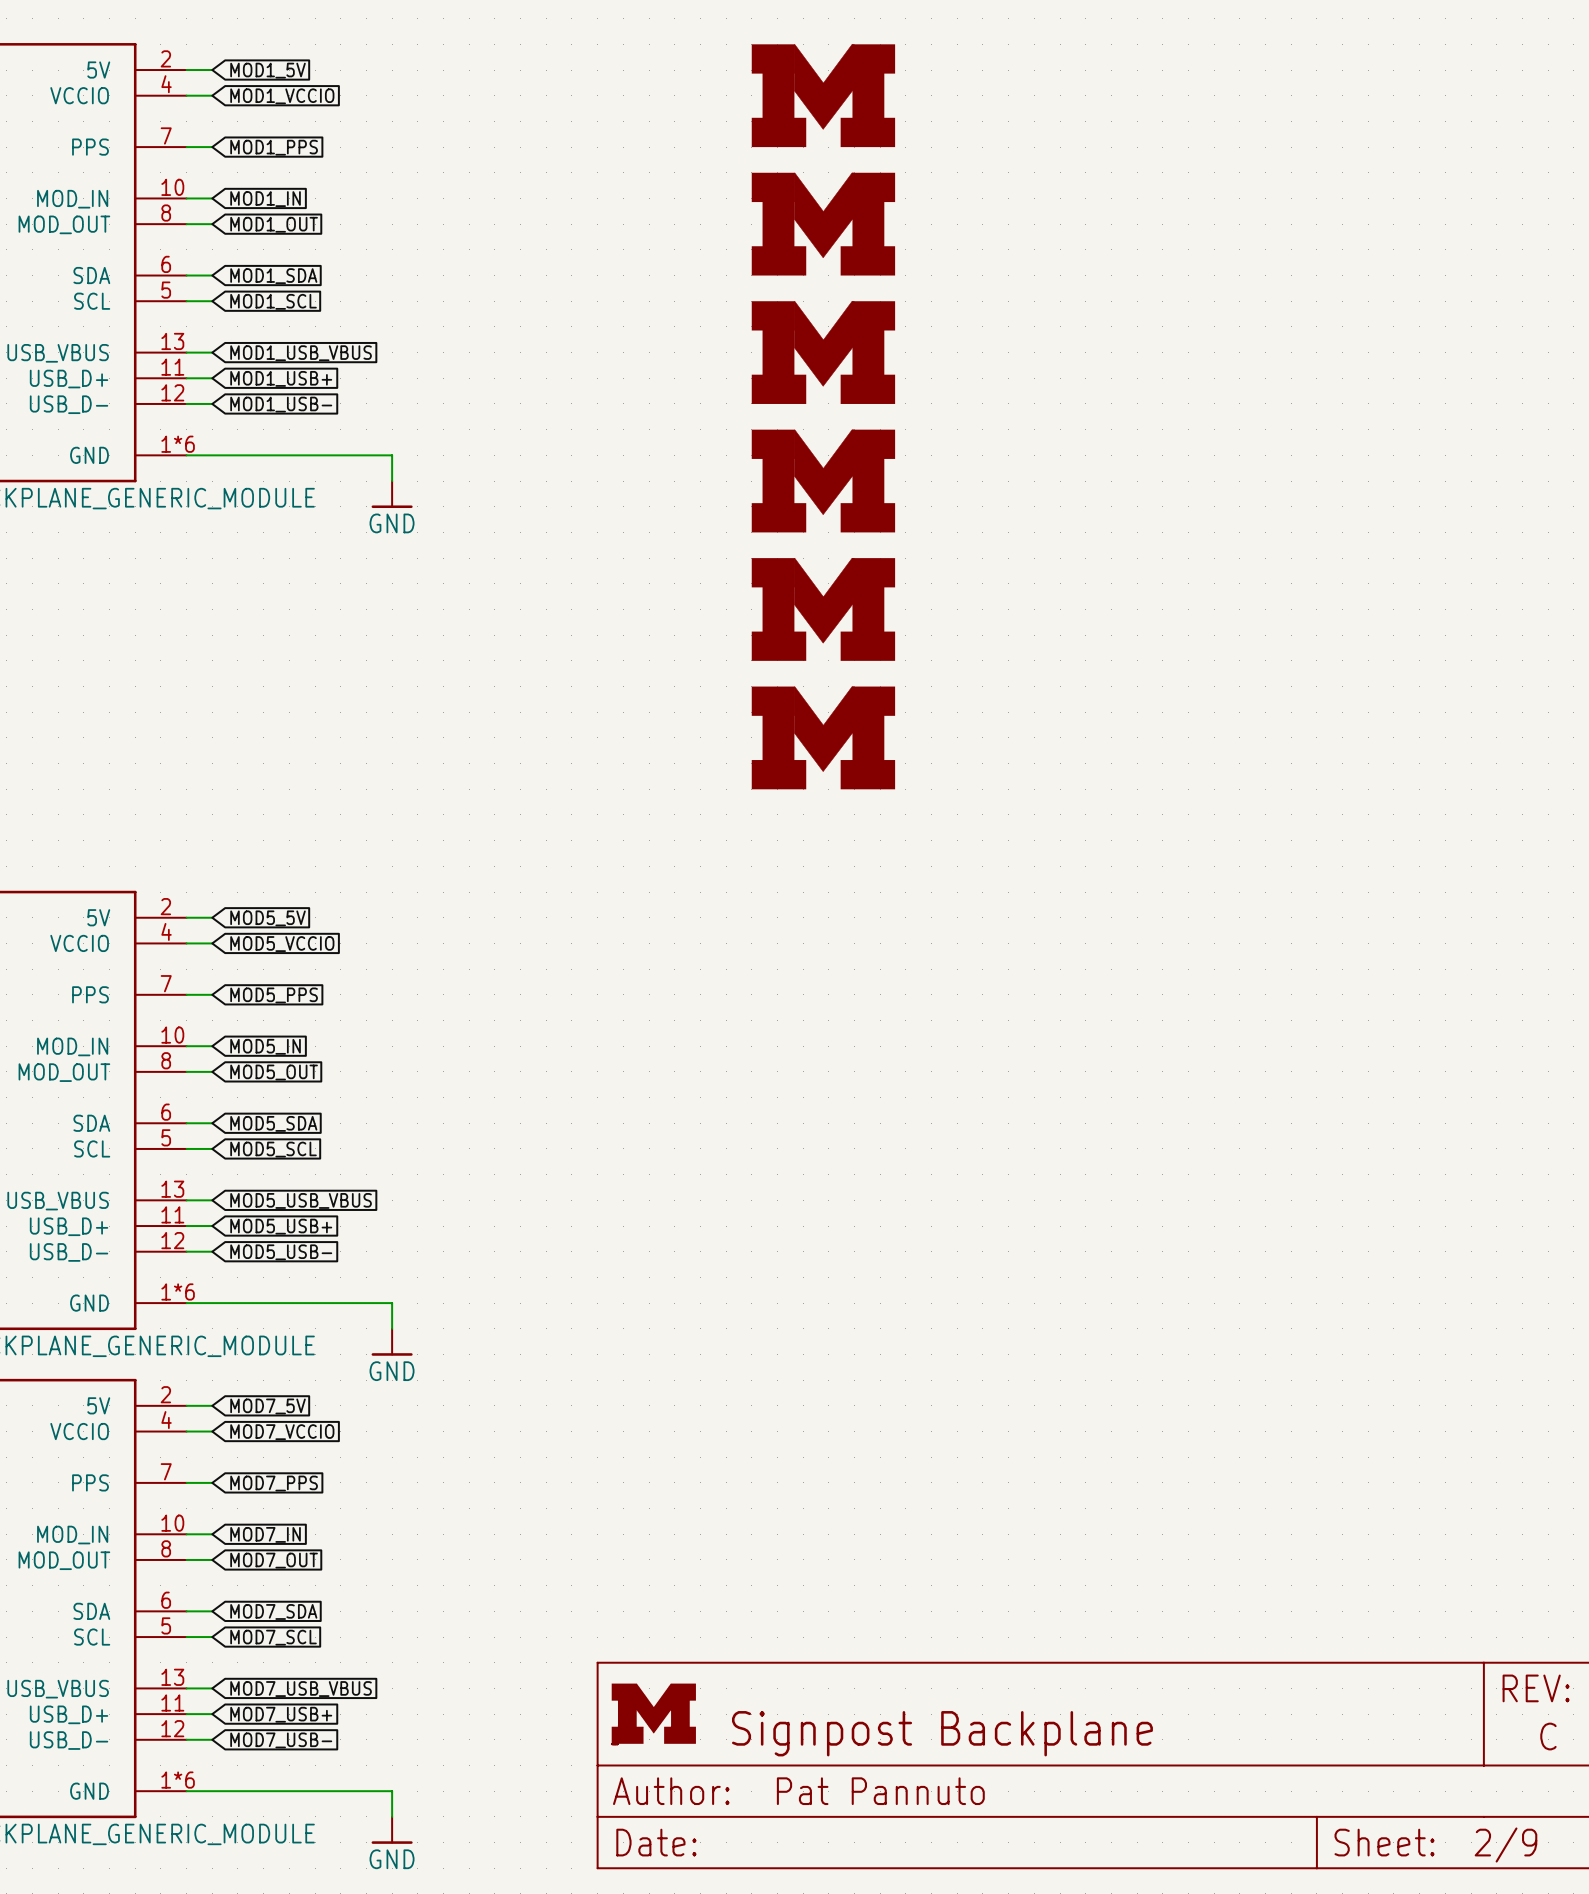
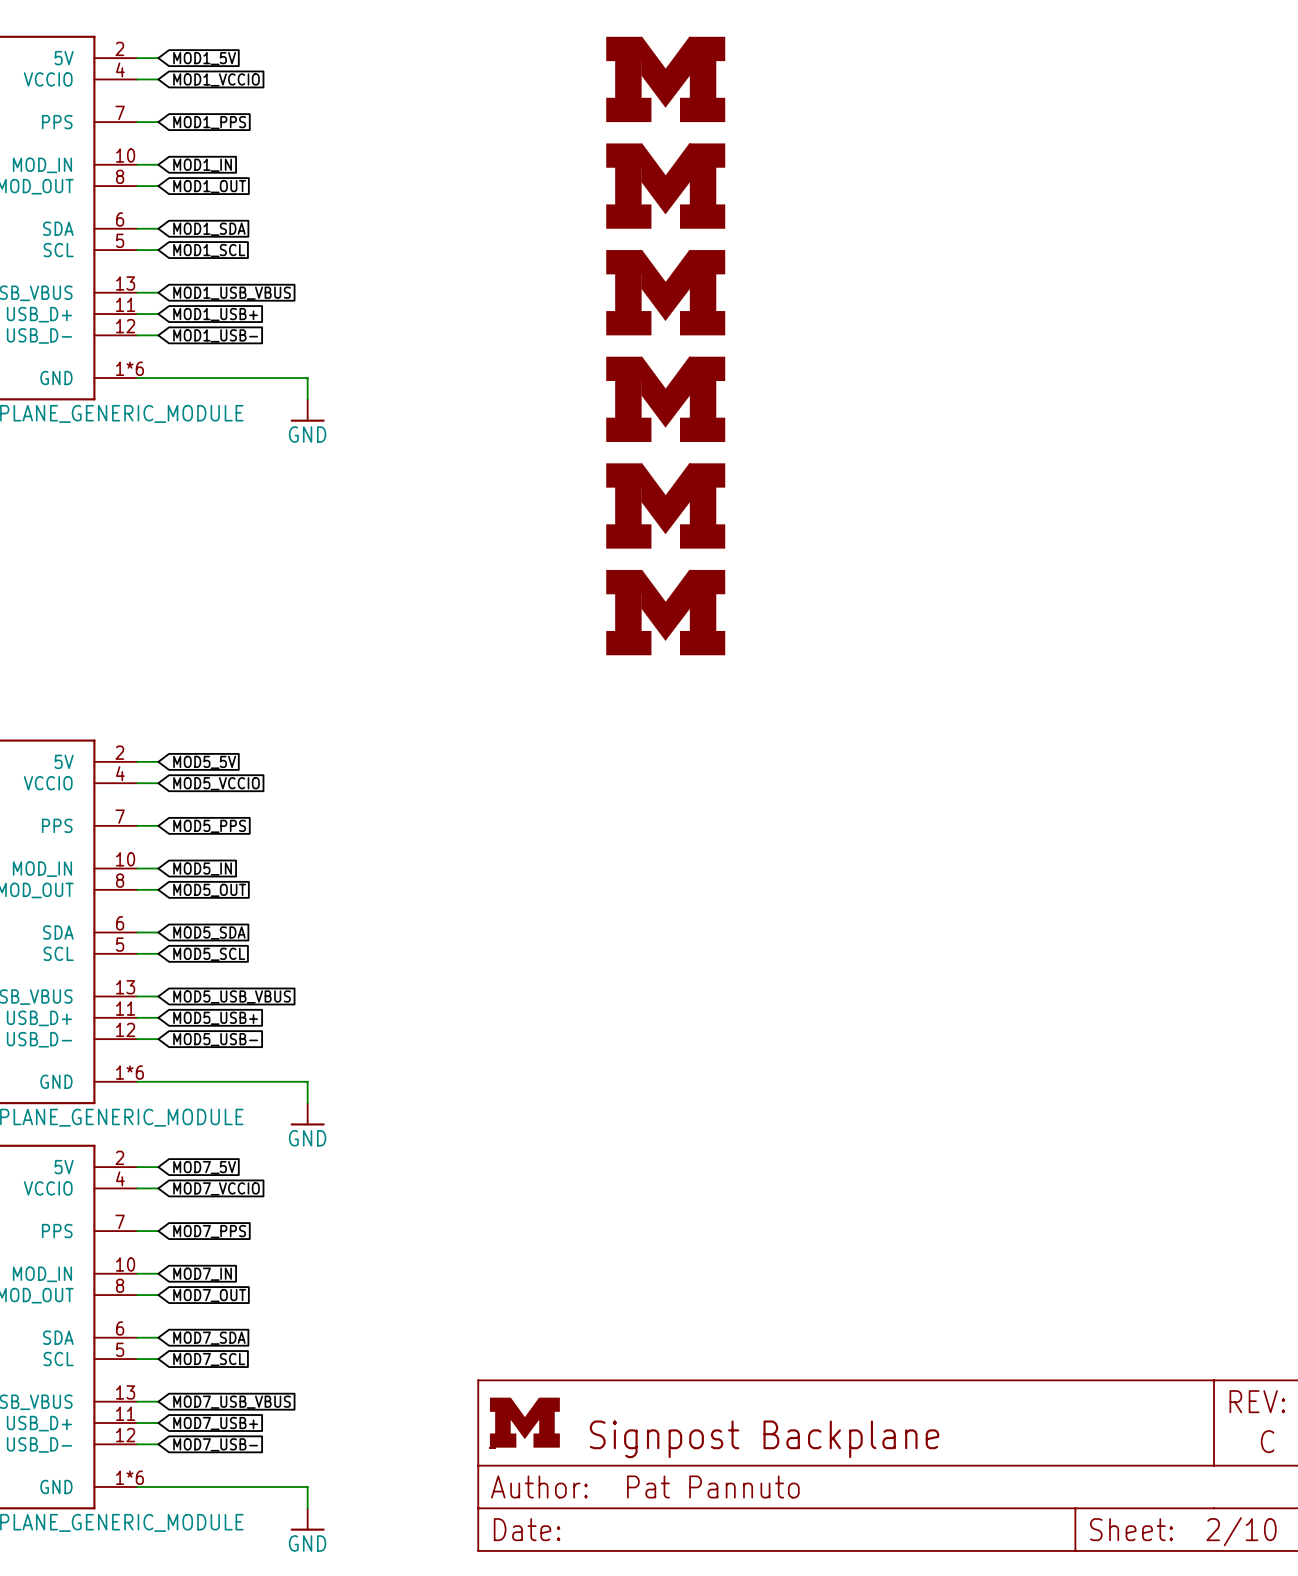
part text: 2/9 (1505, 1845) -> 2/10 (1241, 1531)

